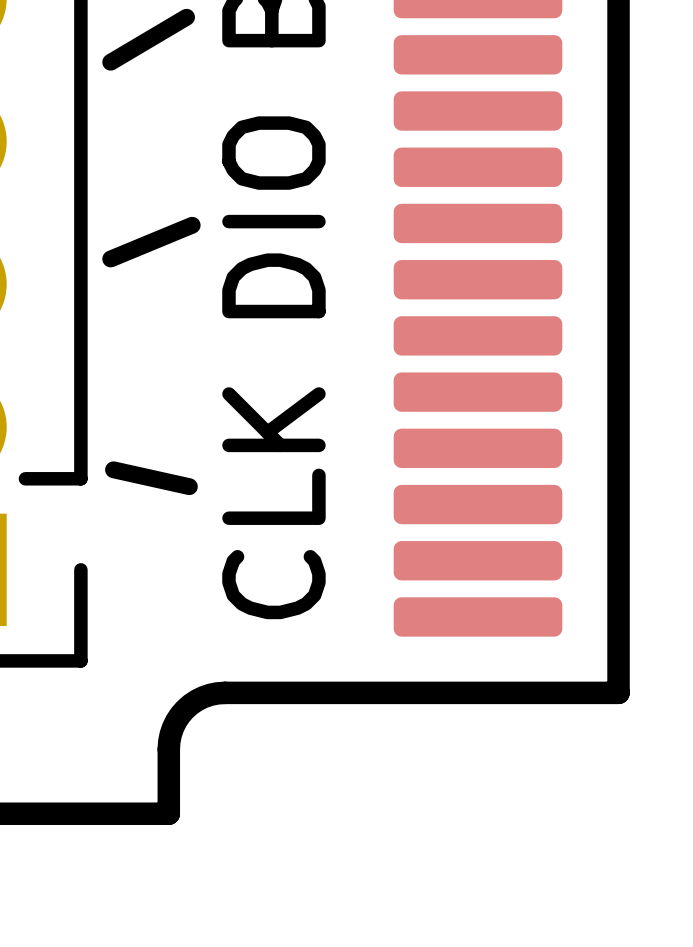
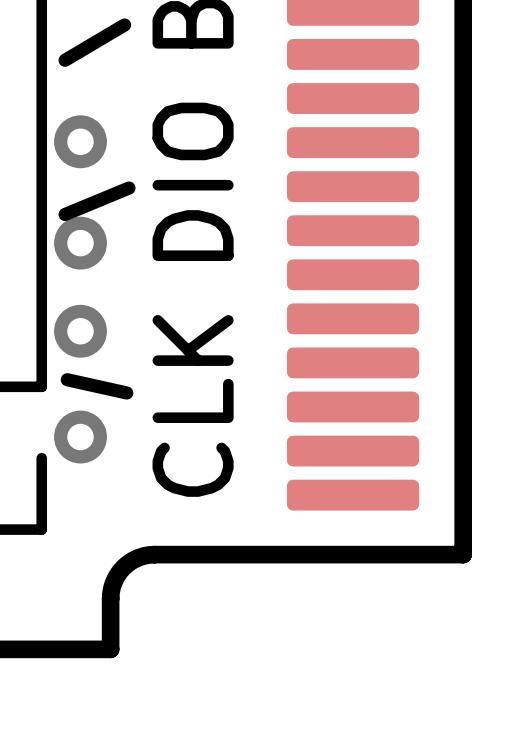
via: none -> (80, 141)
via: none -> (80, 243)
via: none -> (80, 331)
via: none -> (80, 437)

